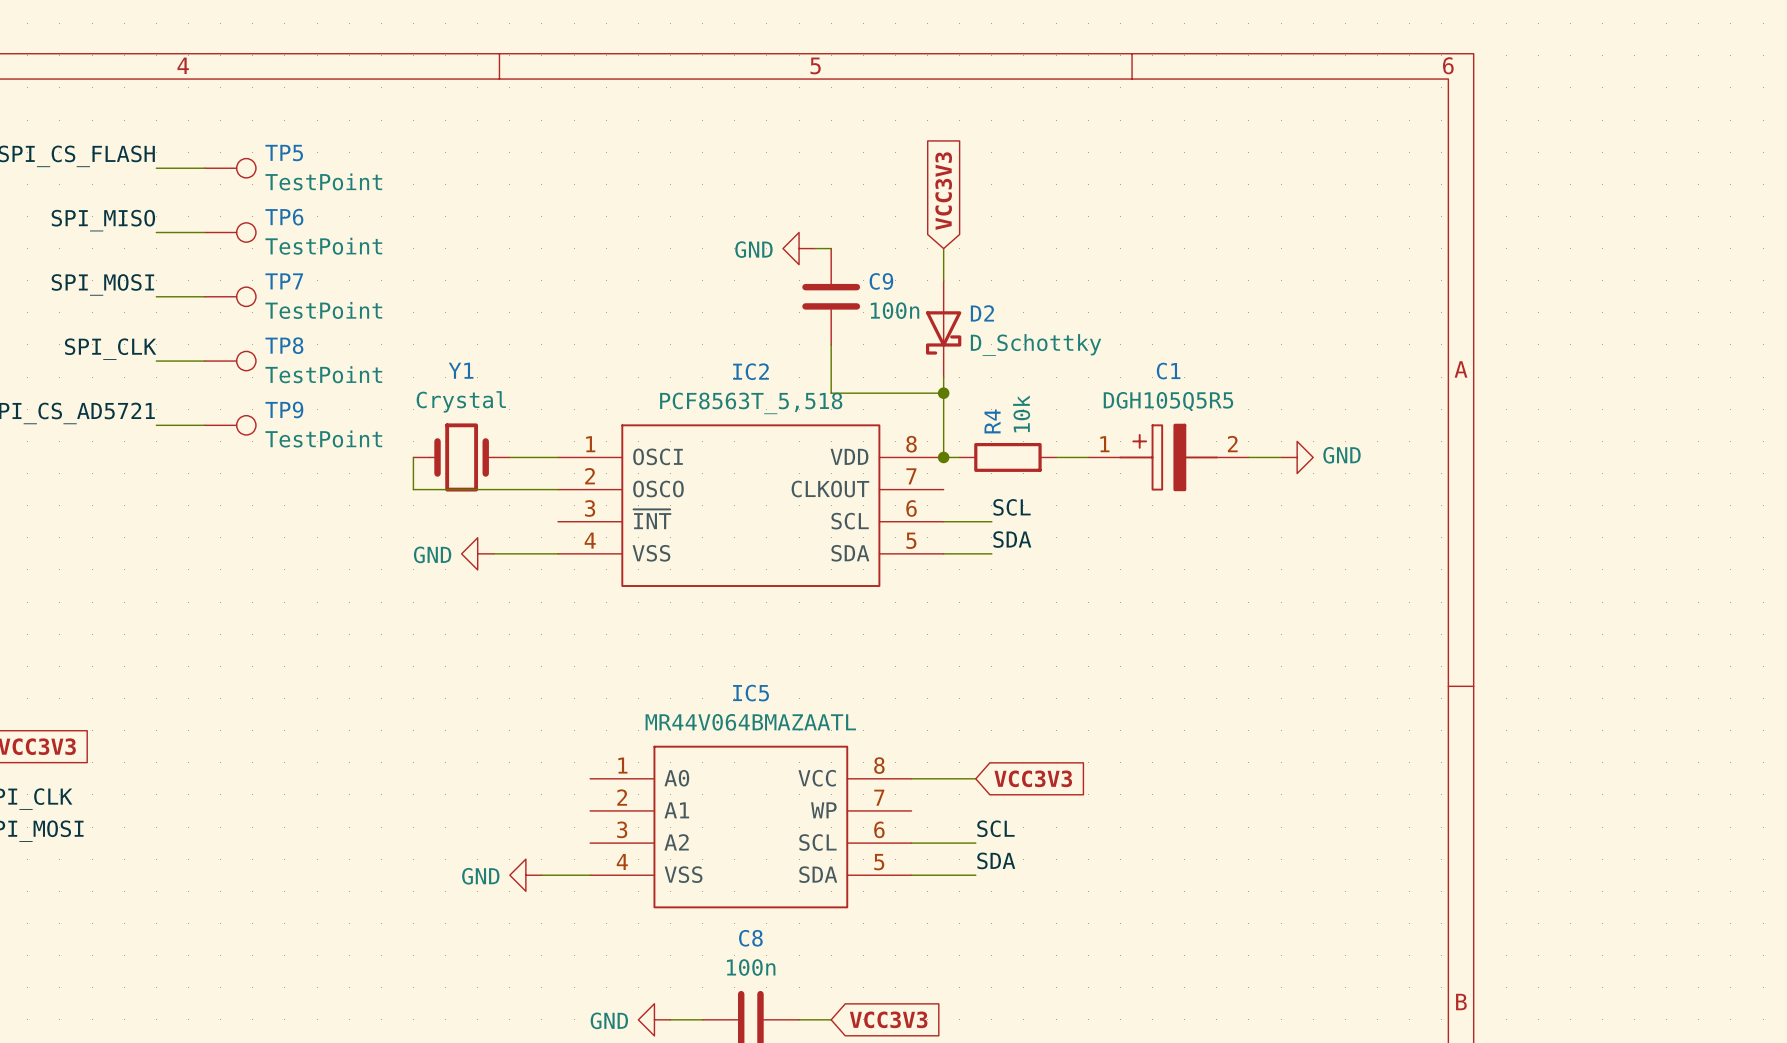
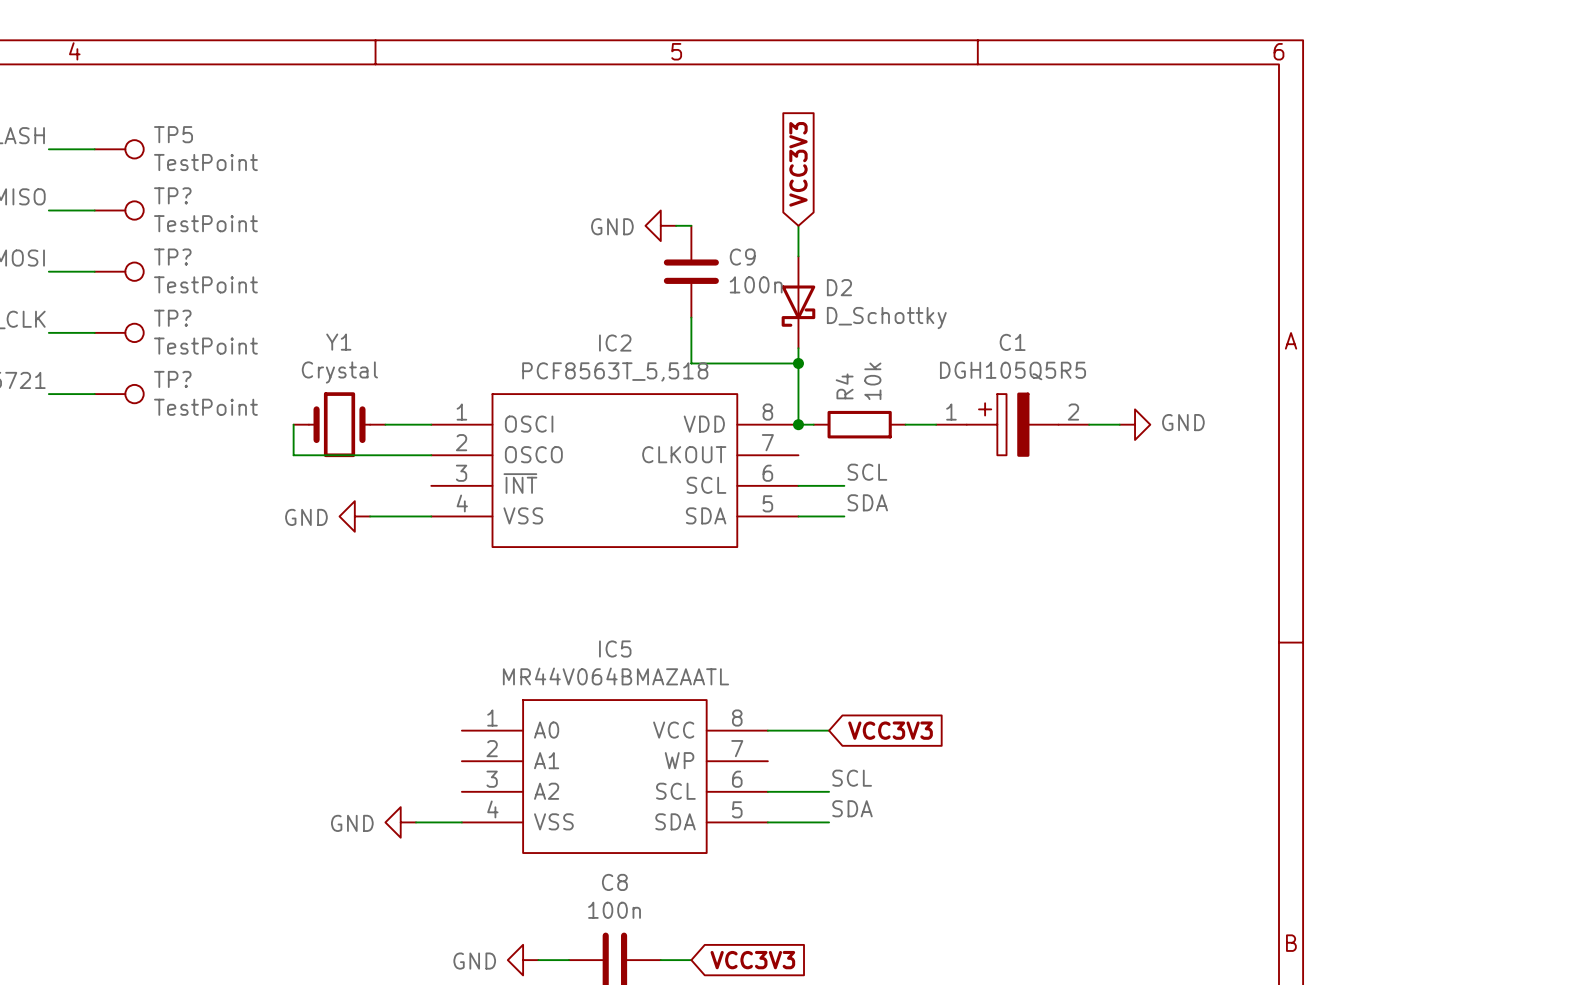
TP6 name: TP6 (284, 217) -> TP? (172, 195)
TP7 name: TP7 (284, 281) -> TP? (172, 257)
TP8 name: TP8 (284, 345) -> TP? (172, 318)
TP9 name: TP9 (284, 409) -> TP? (172, 379)

